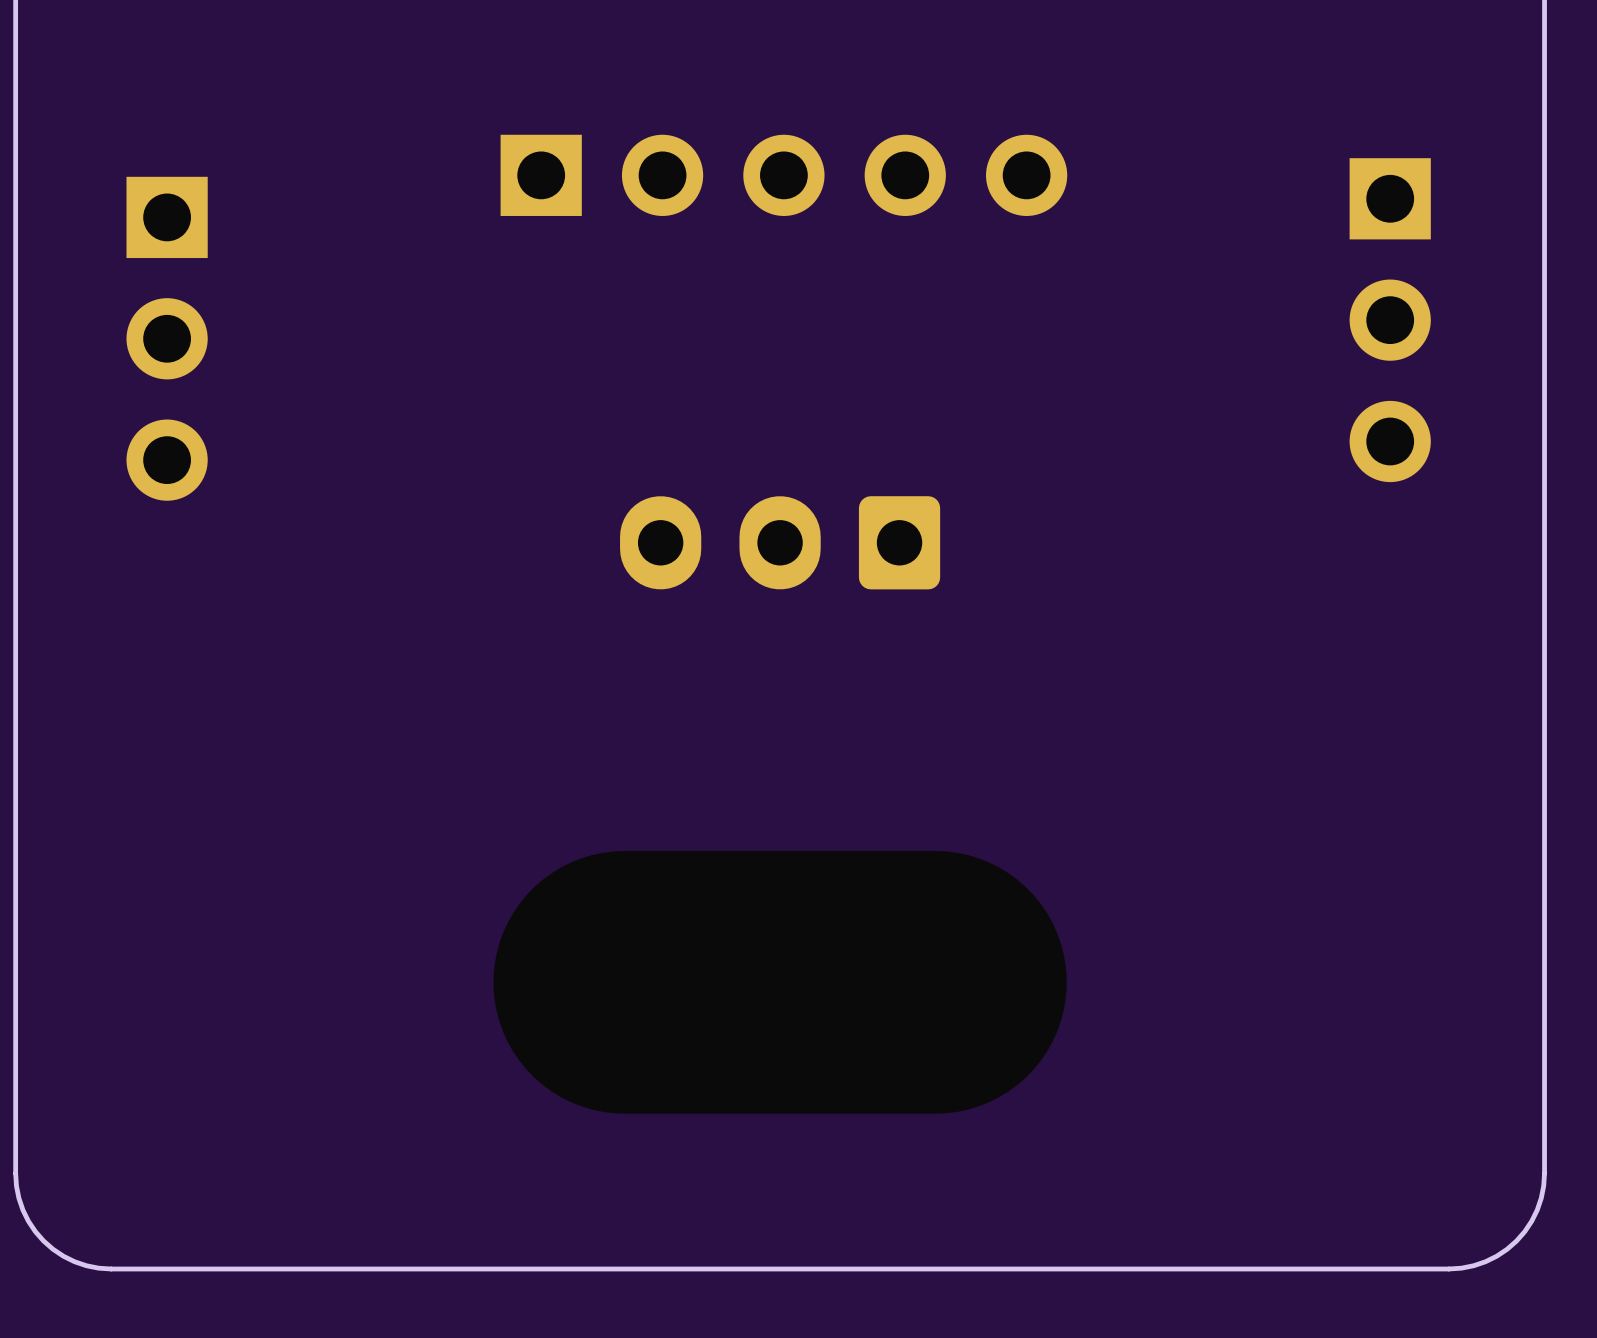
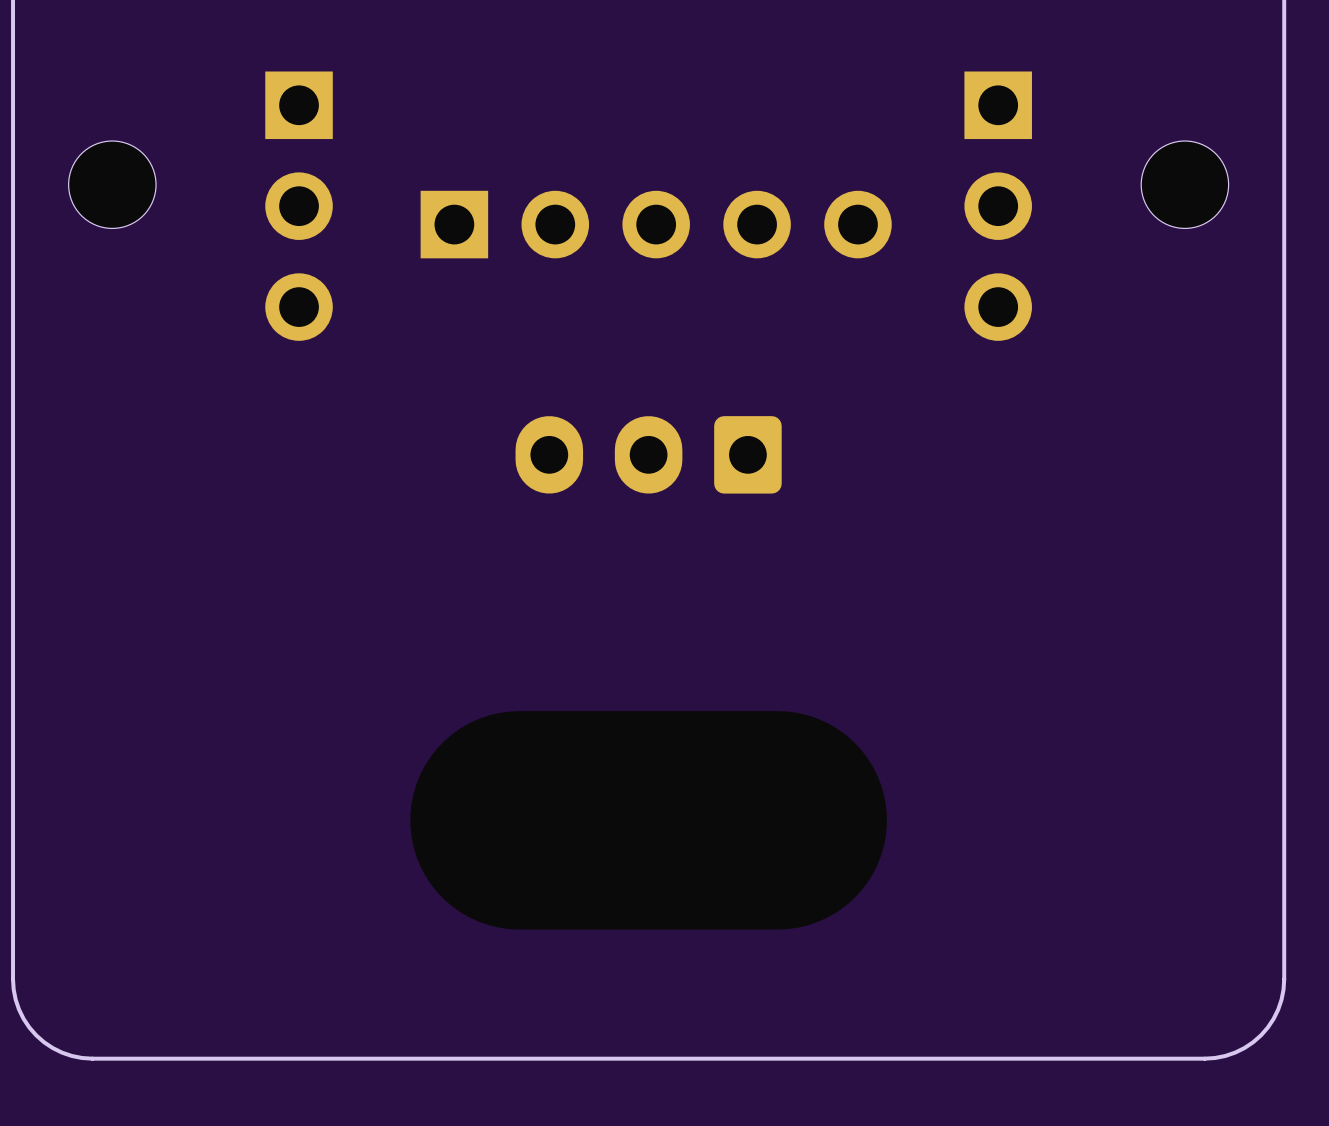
part position: (783, 175) -> (656, 224)
part: none -> (112, 184)
part: none -> (1184, 184)
part position: (1390, 320) -> (998, 206)
part position: (167, 338) -> (299, 206)

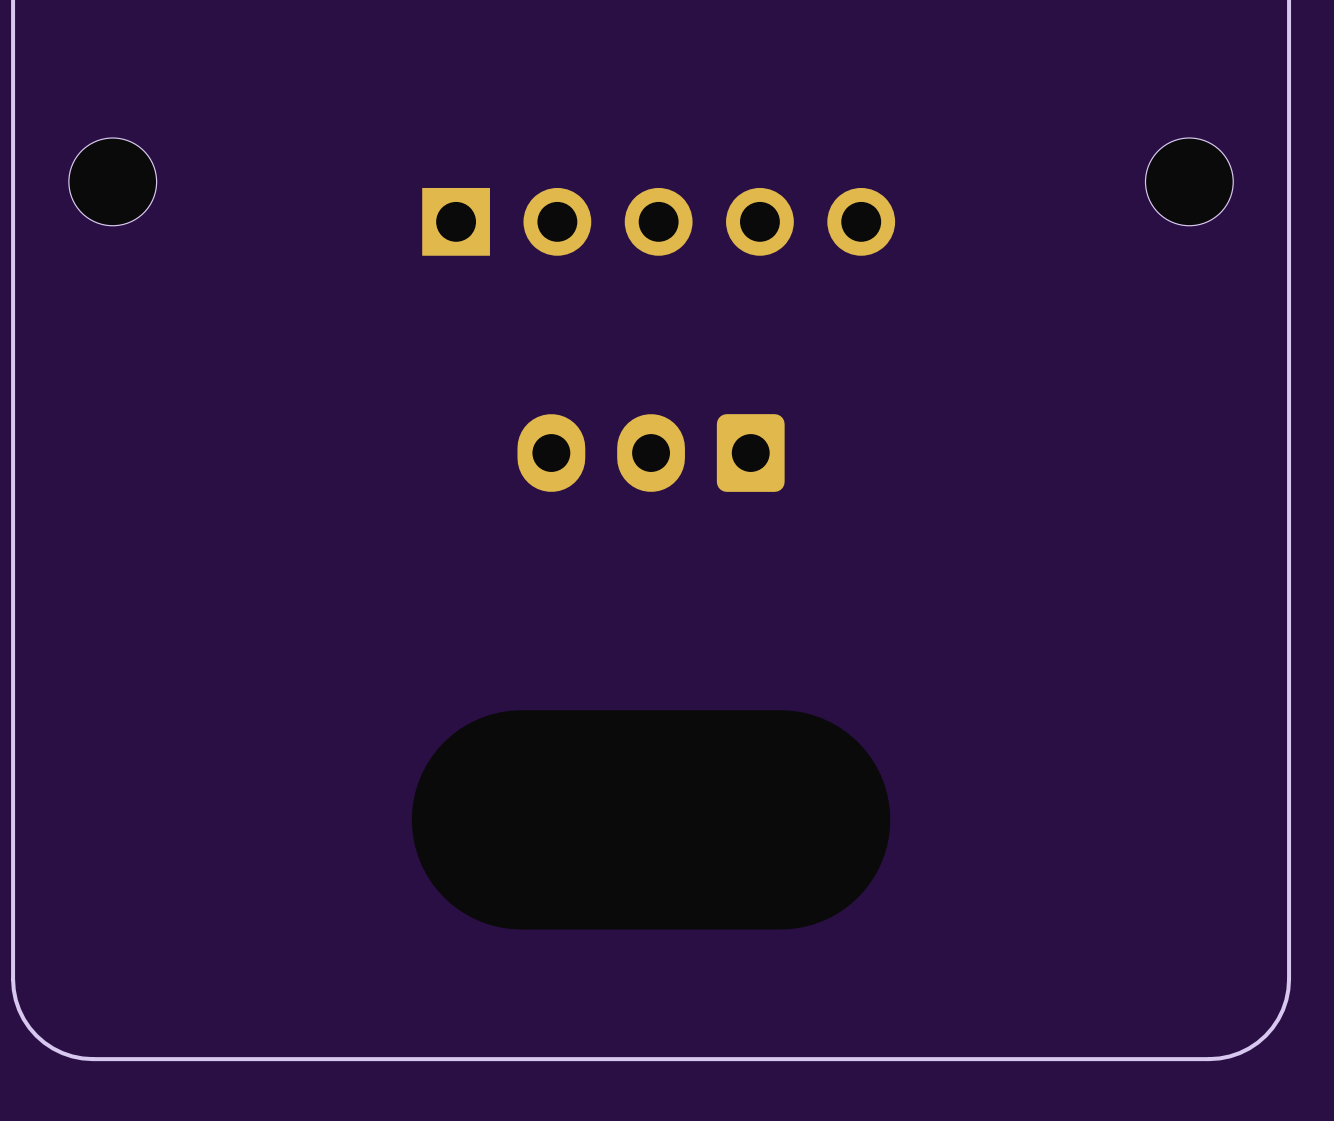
part: (299, 206) -> none
part: (998, 206) -> none

